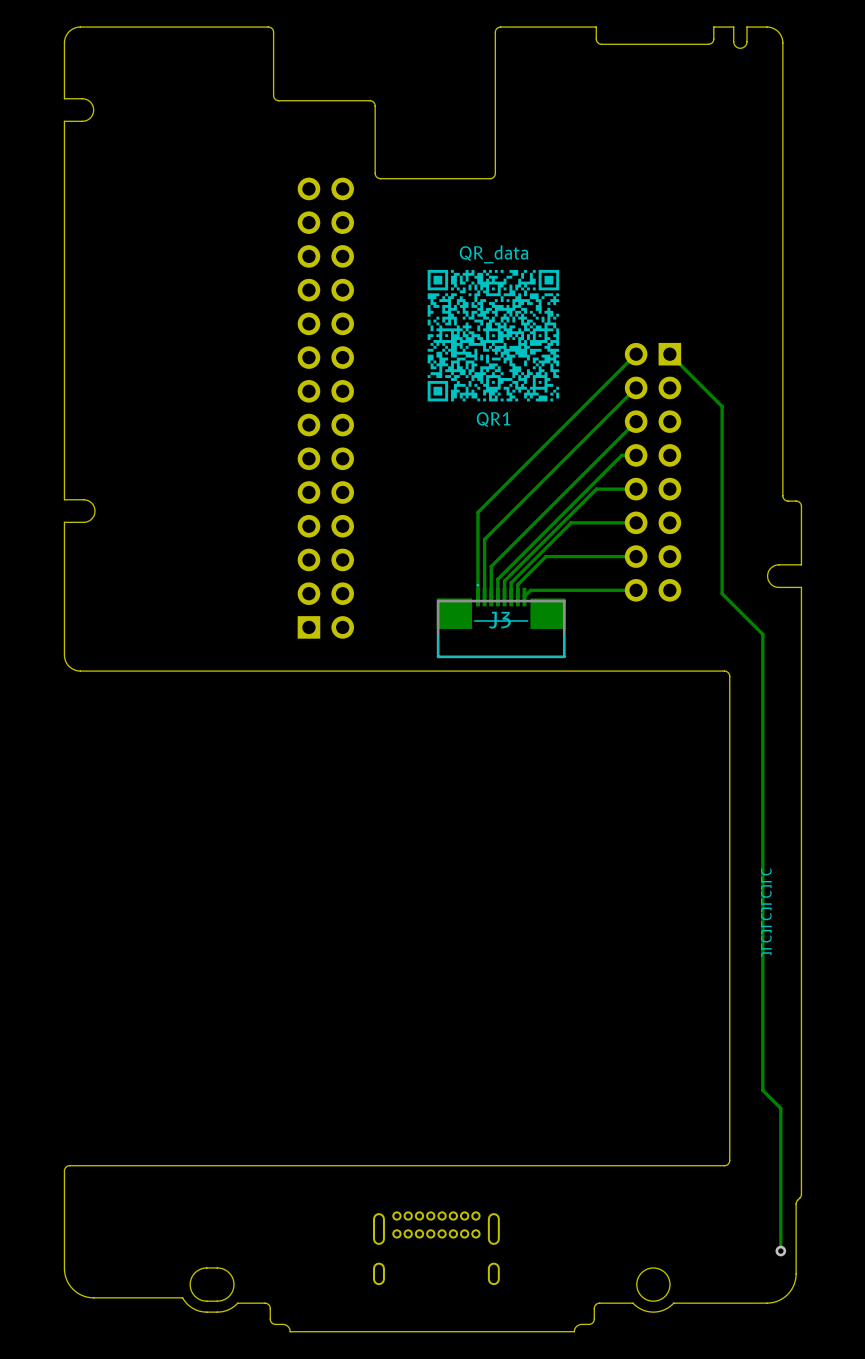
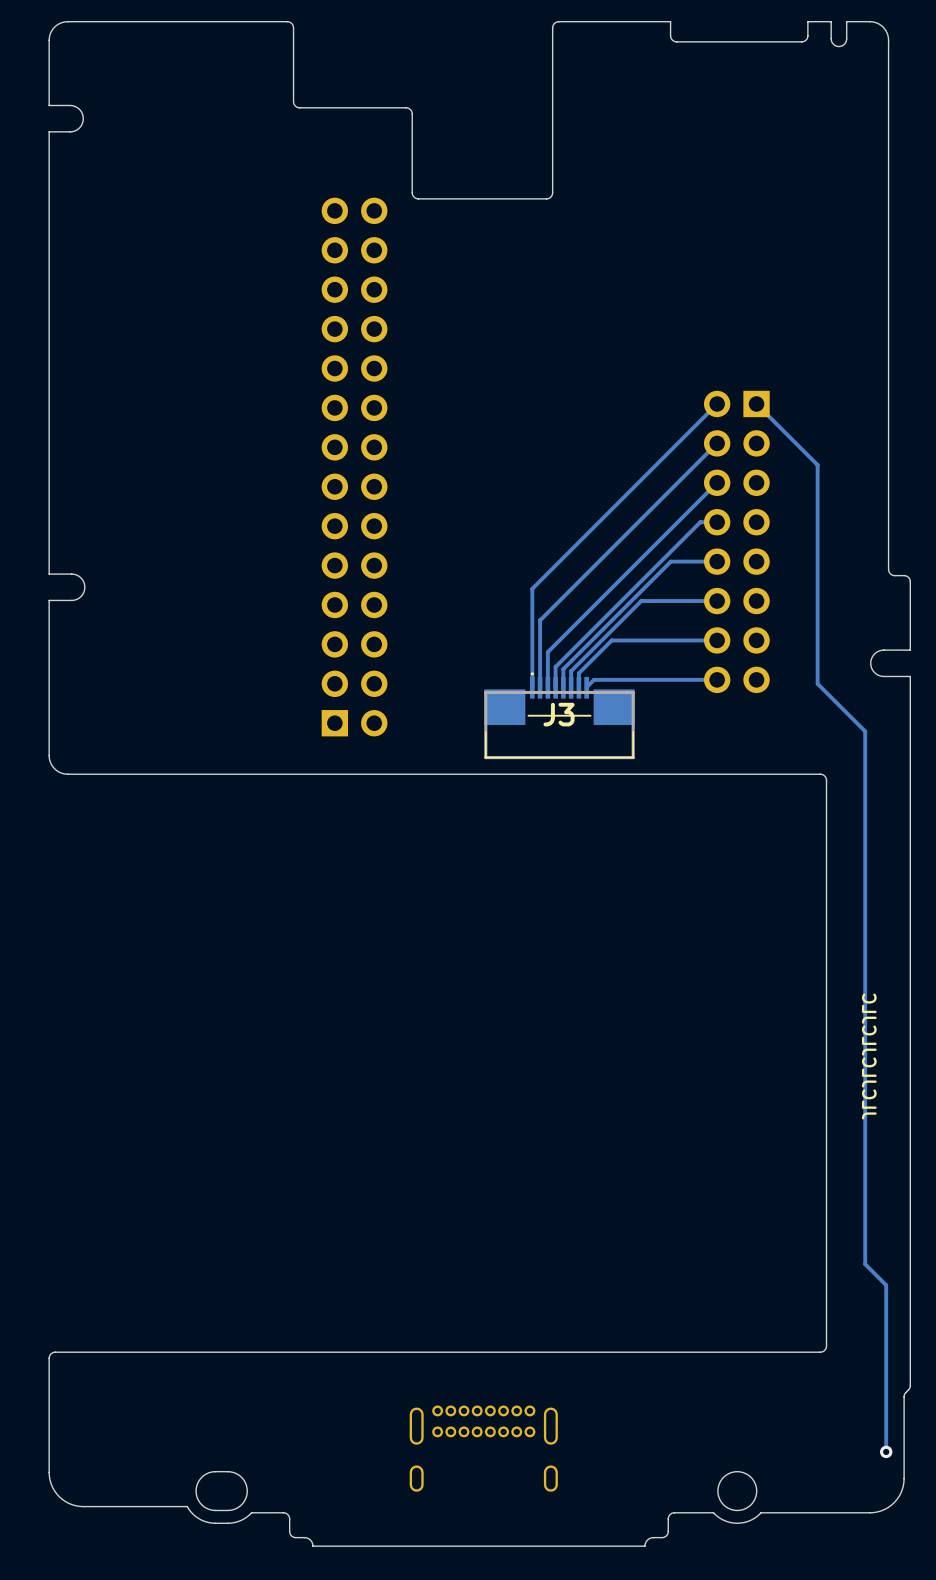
QR1: QR_data (493, 335) -> none

